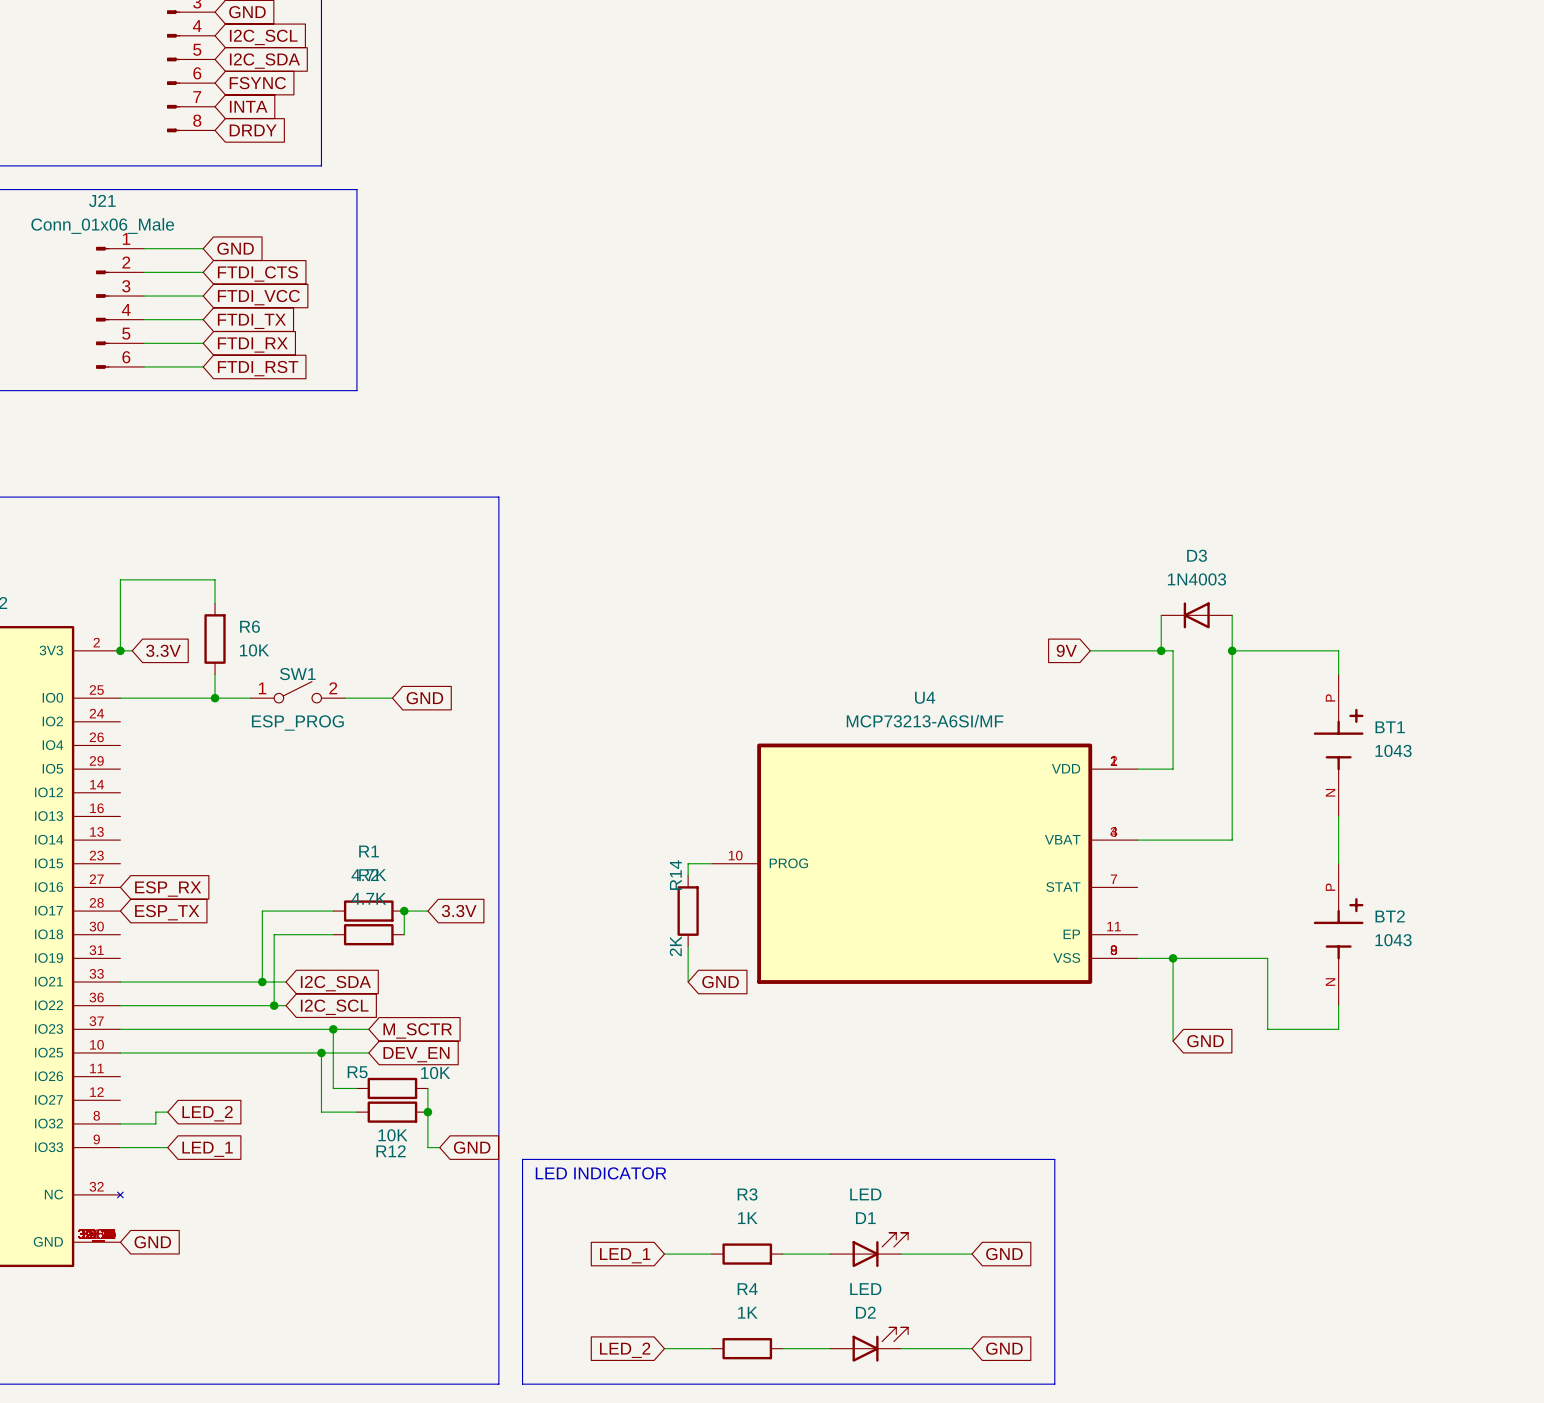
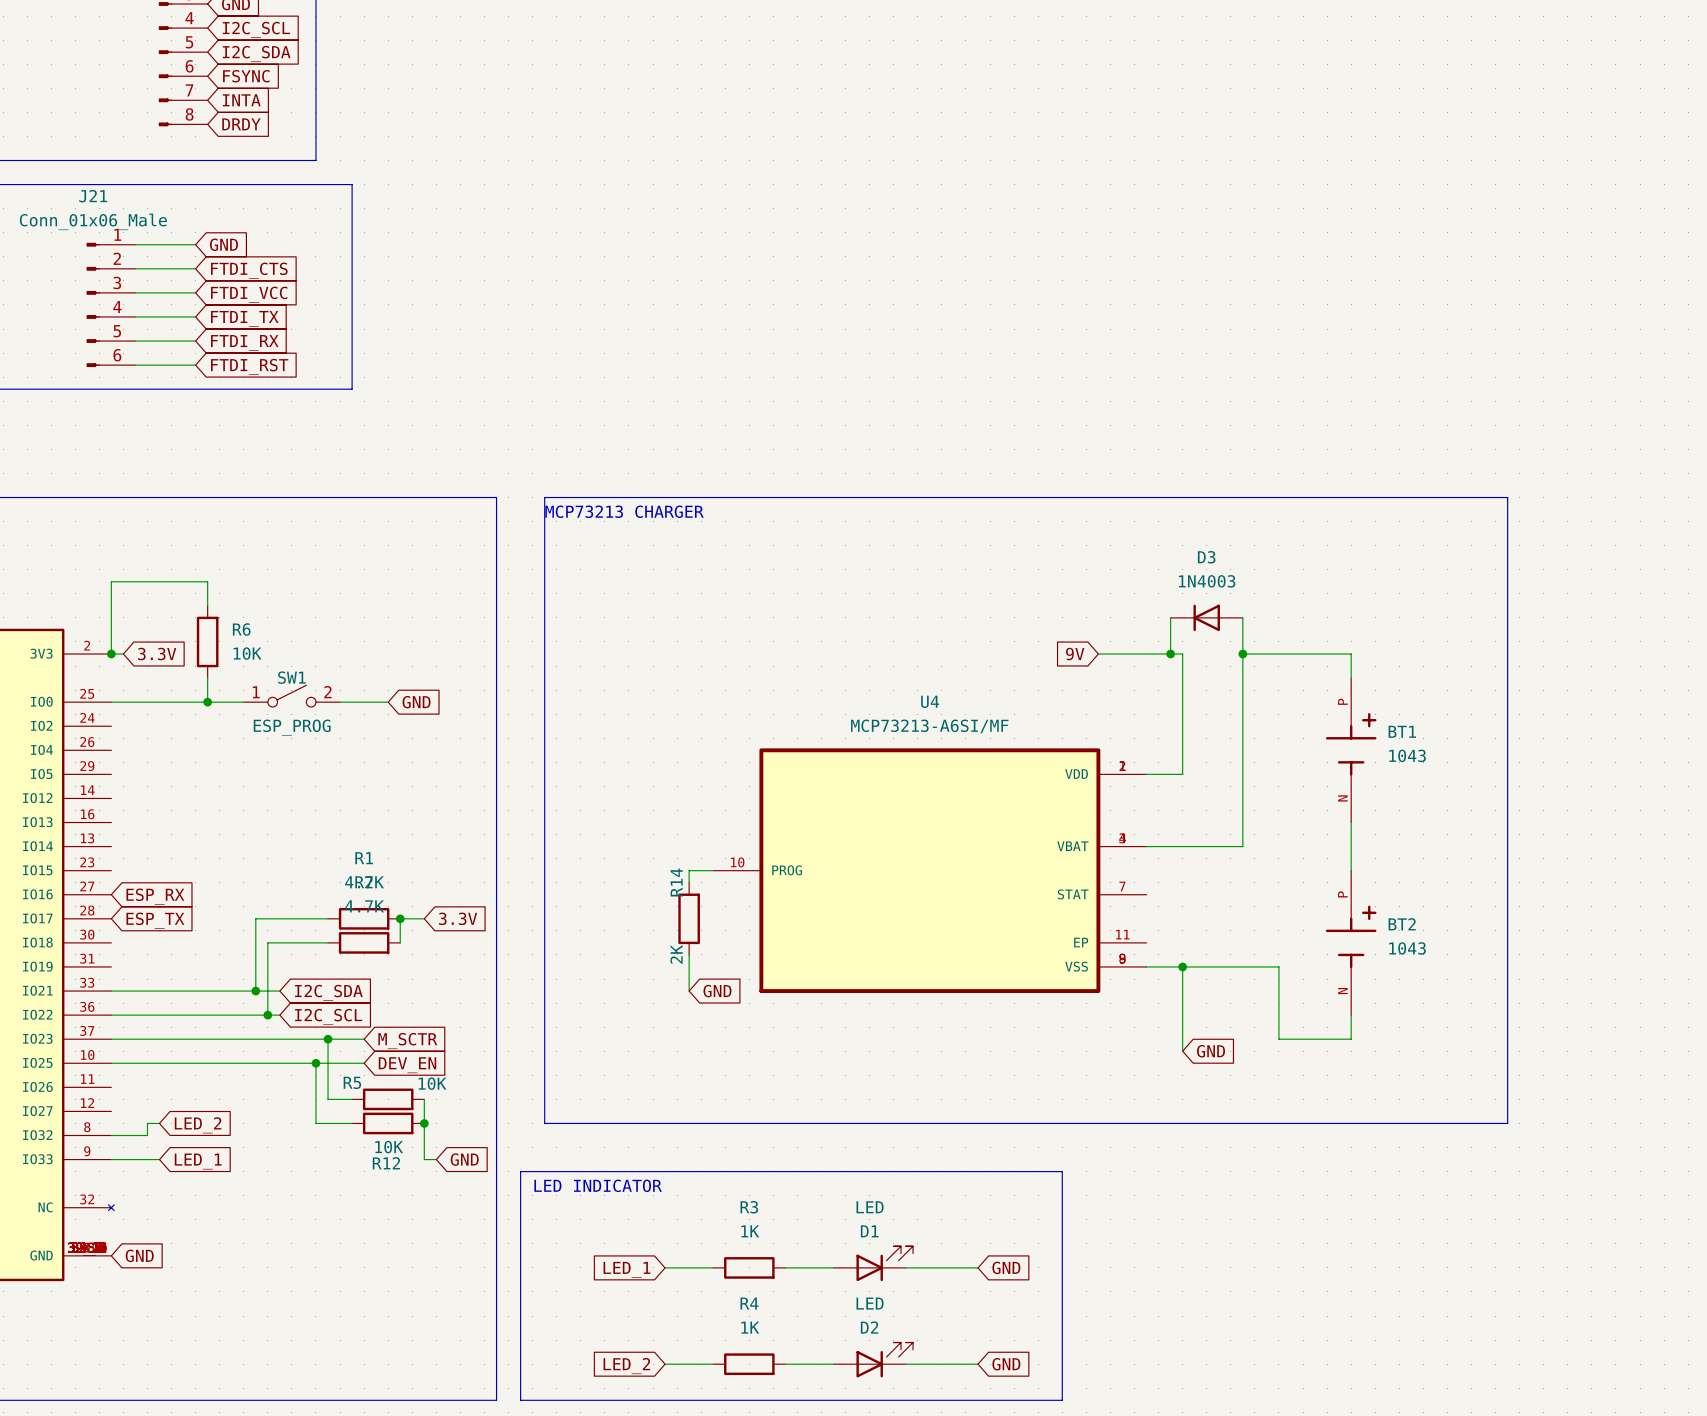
line: none -> (544, 497) (1507, 497) (1507, 1123) (544, 1123) (544, 497)
text: none -> MCP73213 CHARGER (624, 511)

